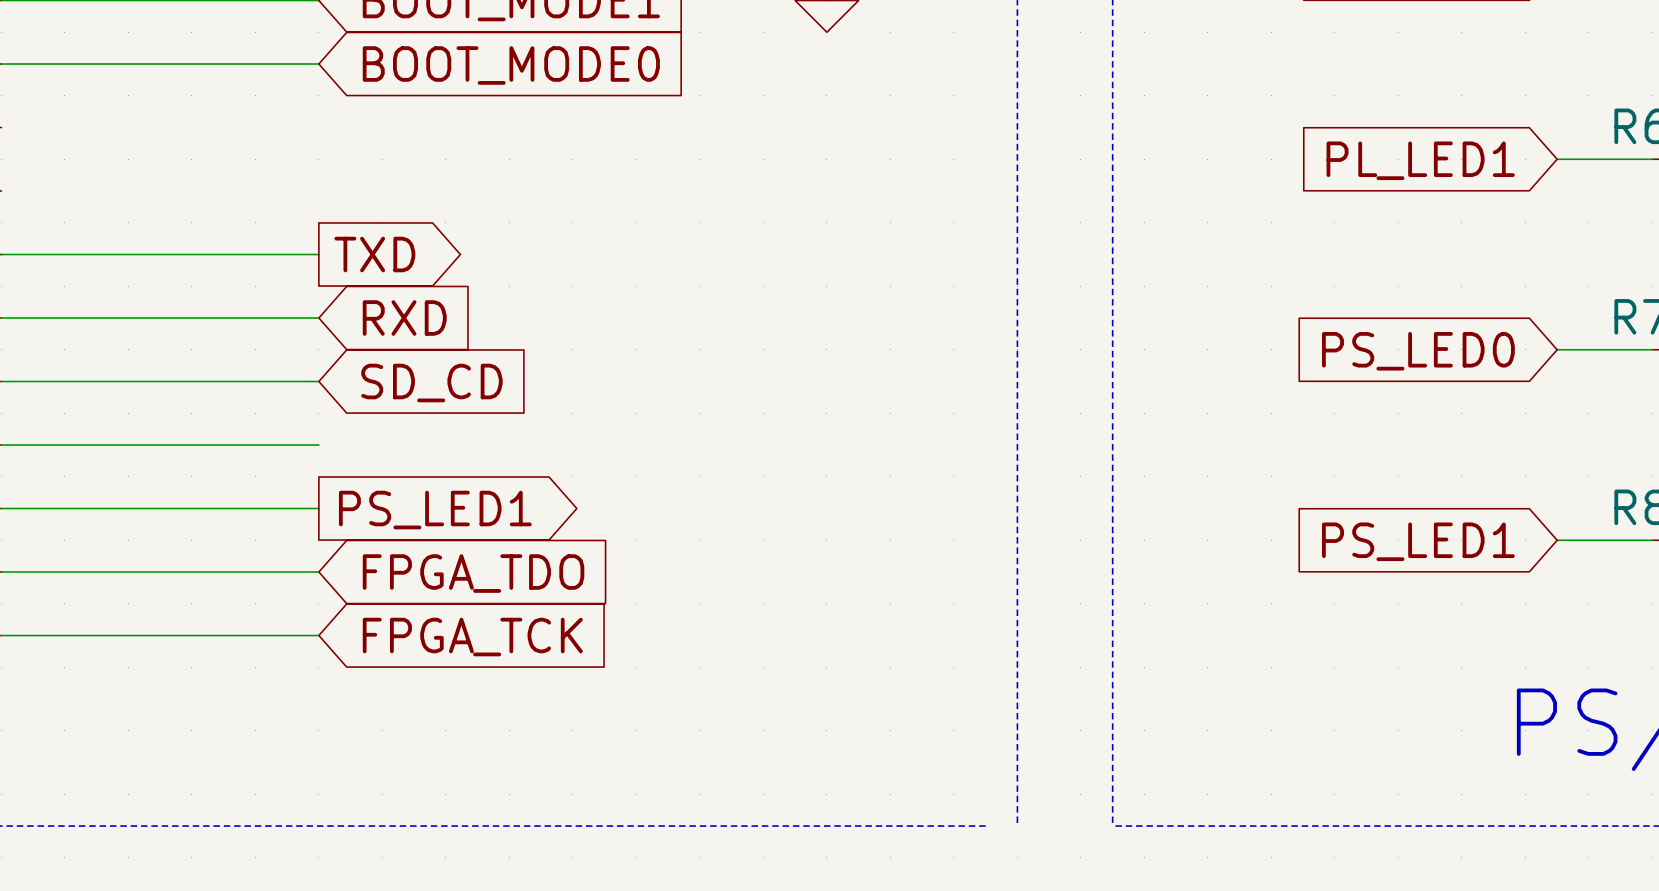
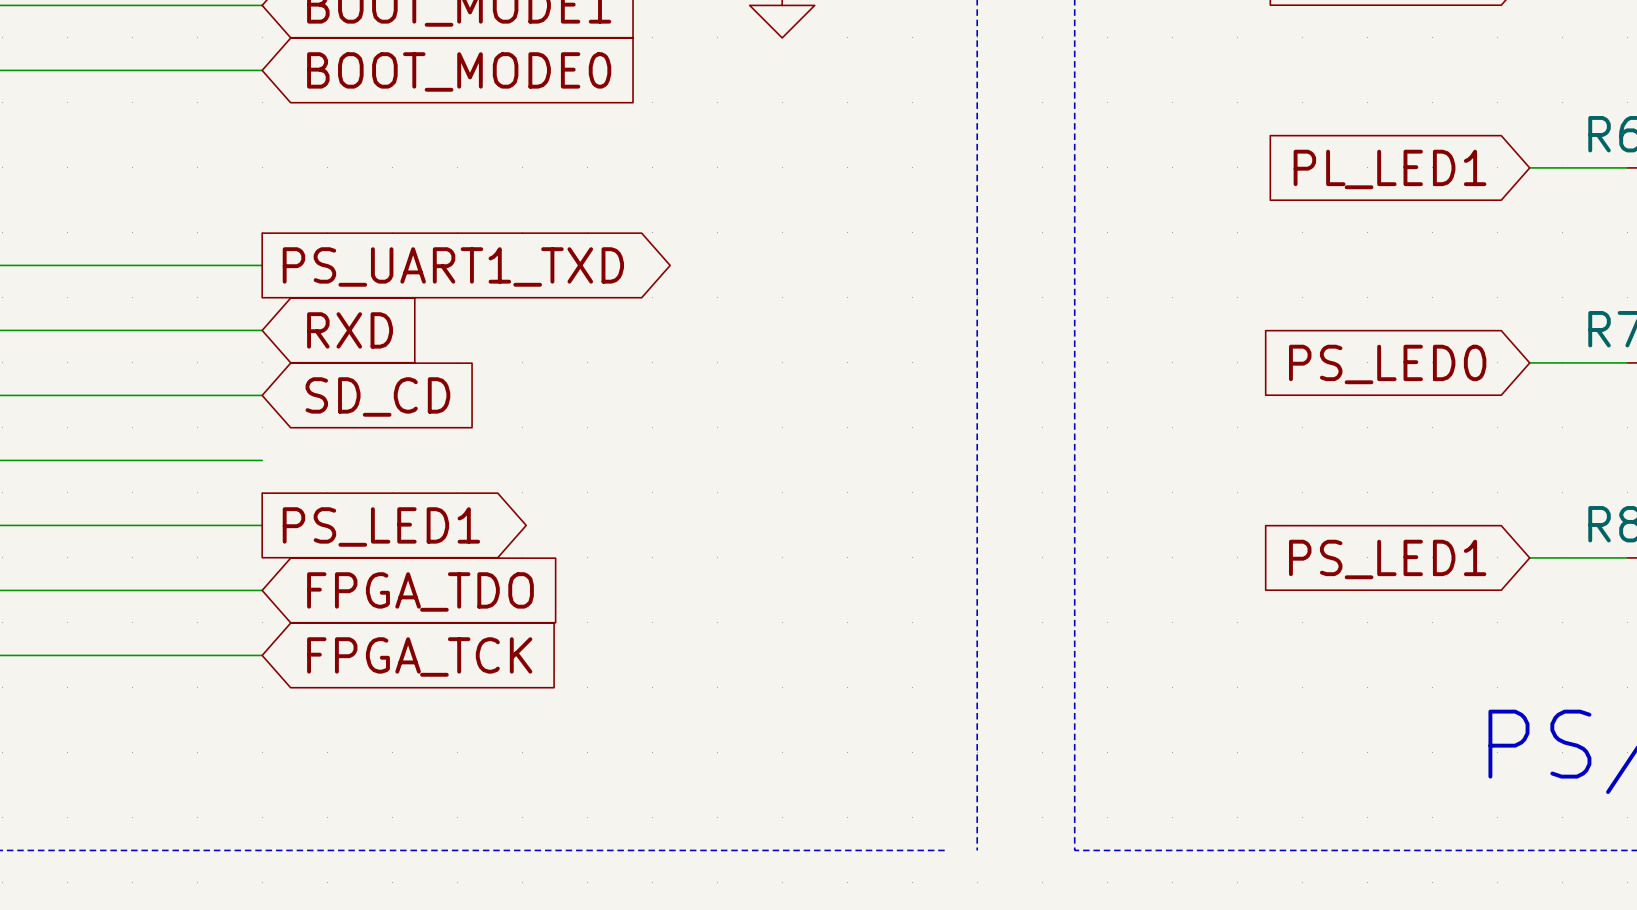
global label: TXD (374, 254) -> PS_UART1_TXD (453, 266)

